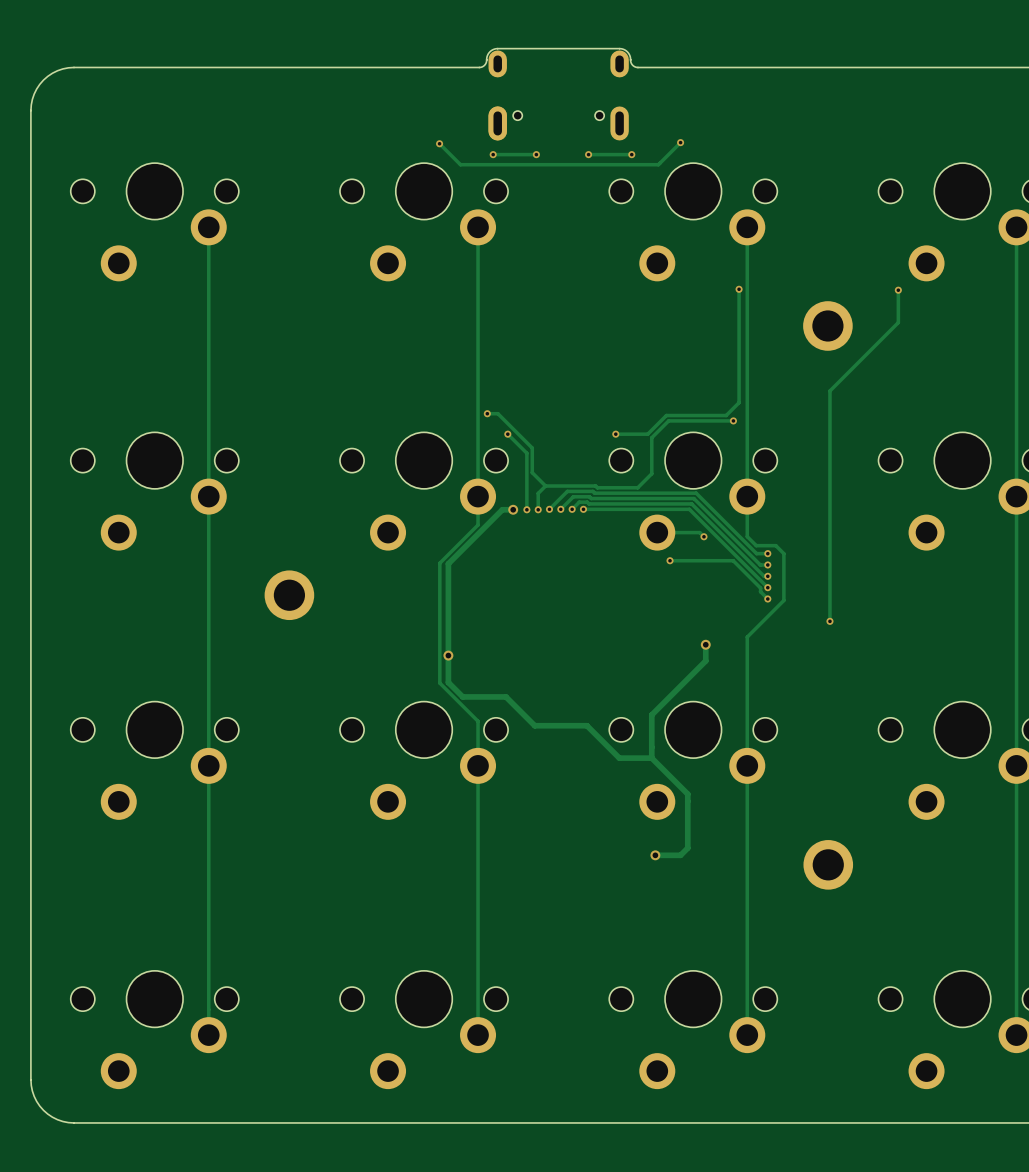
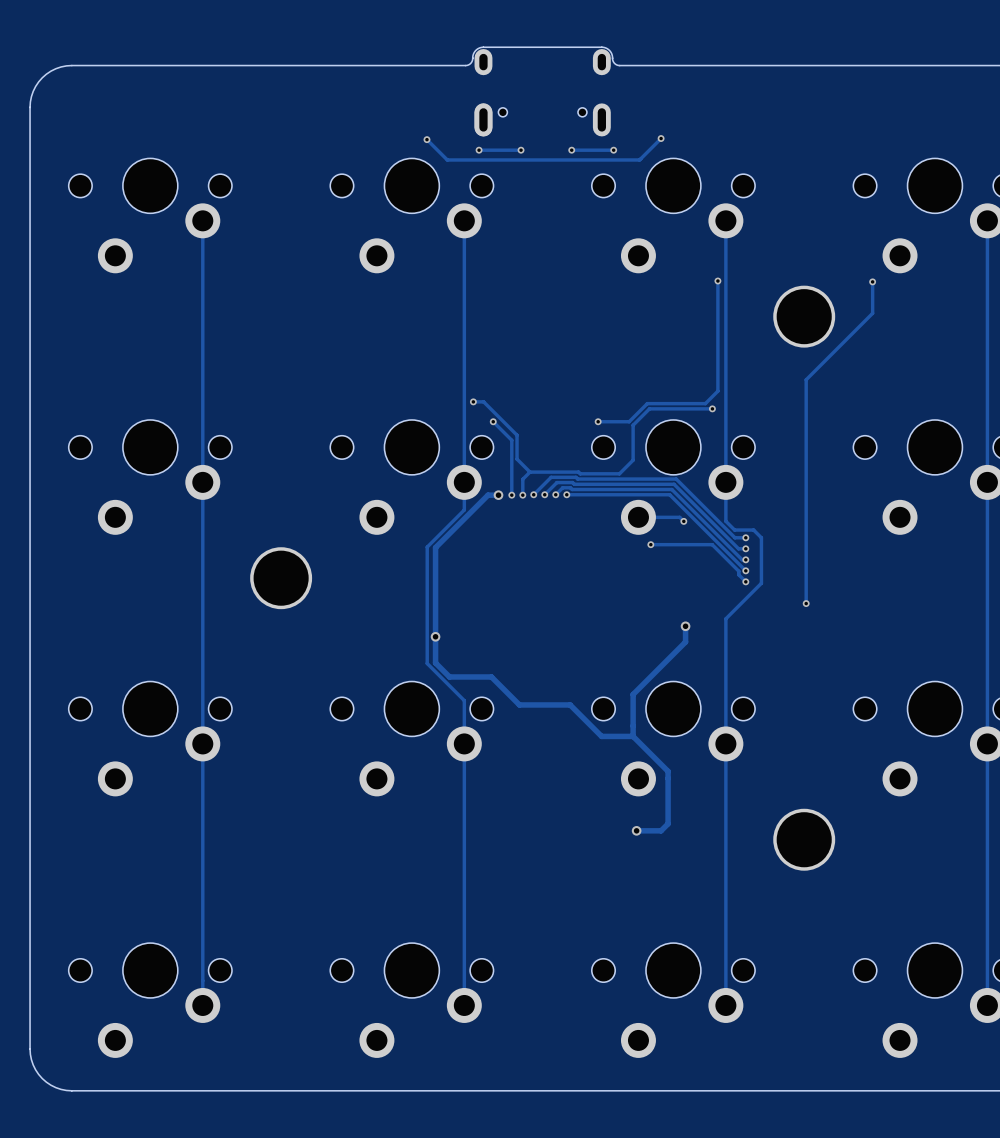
part footprint: [803, 301, 853, 351] -> [773, 285, 836, 348]
part footprint: [264, 570, 315, 621] -> [250, 547, 313, 610]
part footprint: [803, 840, 854, 890] -> [773, 808, 836, 871]

